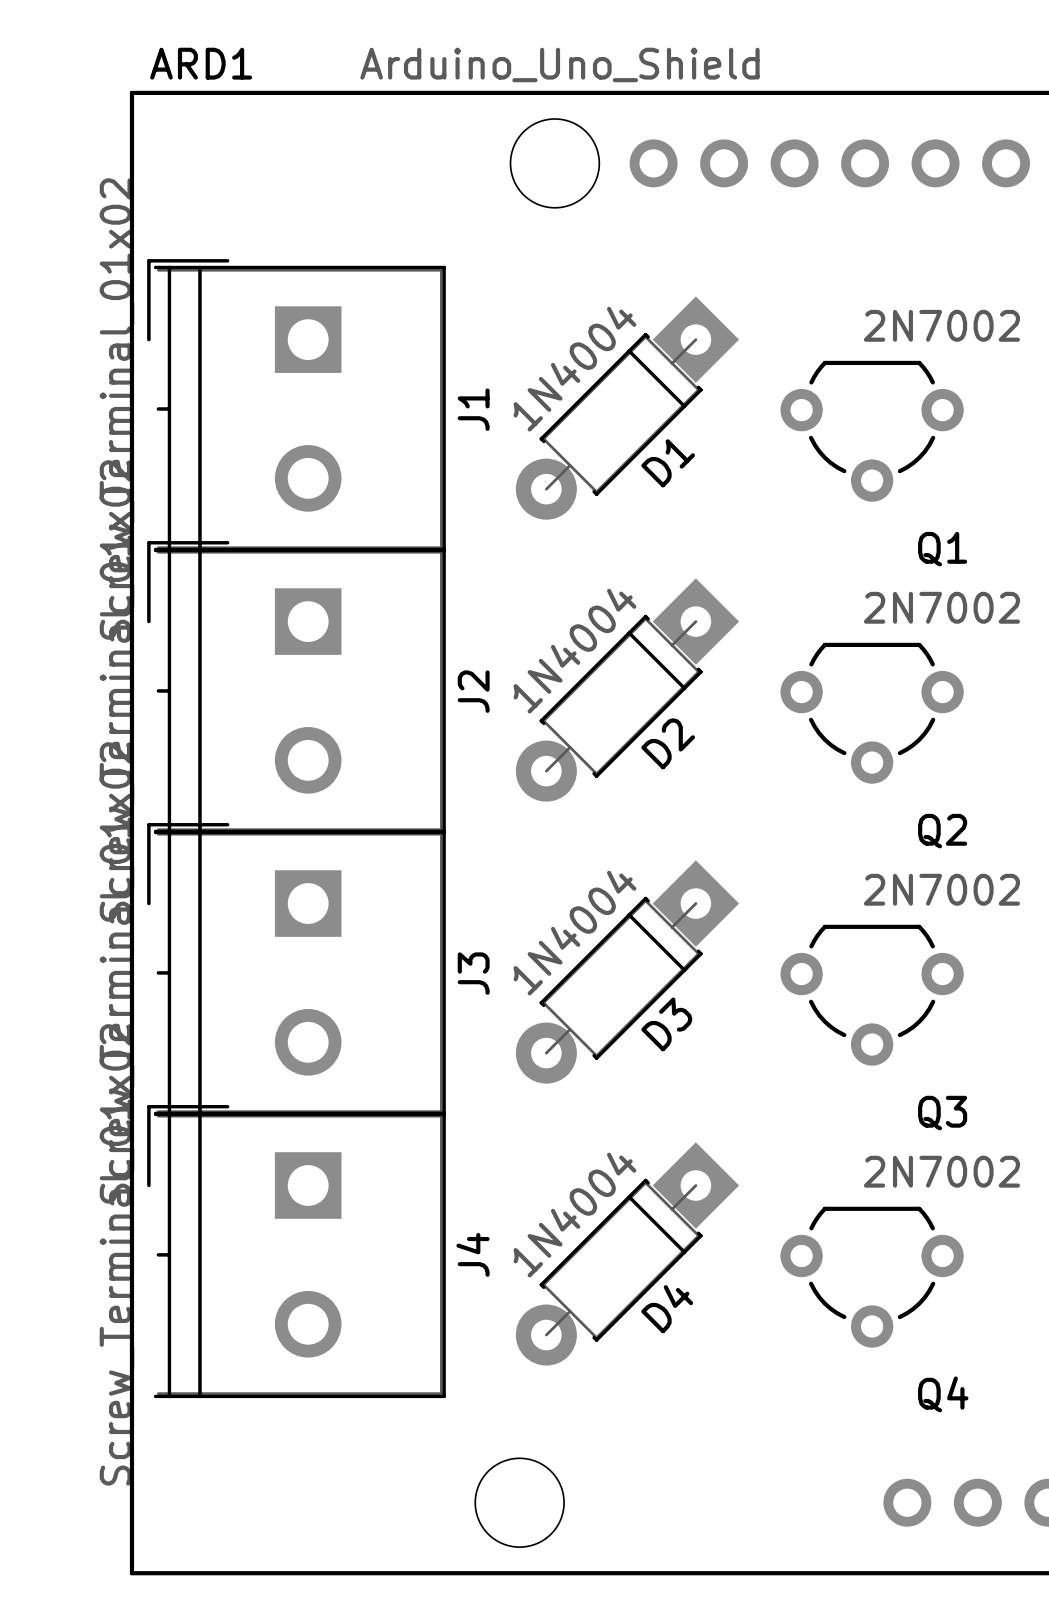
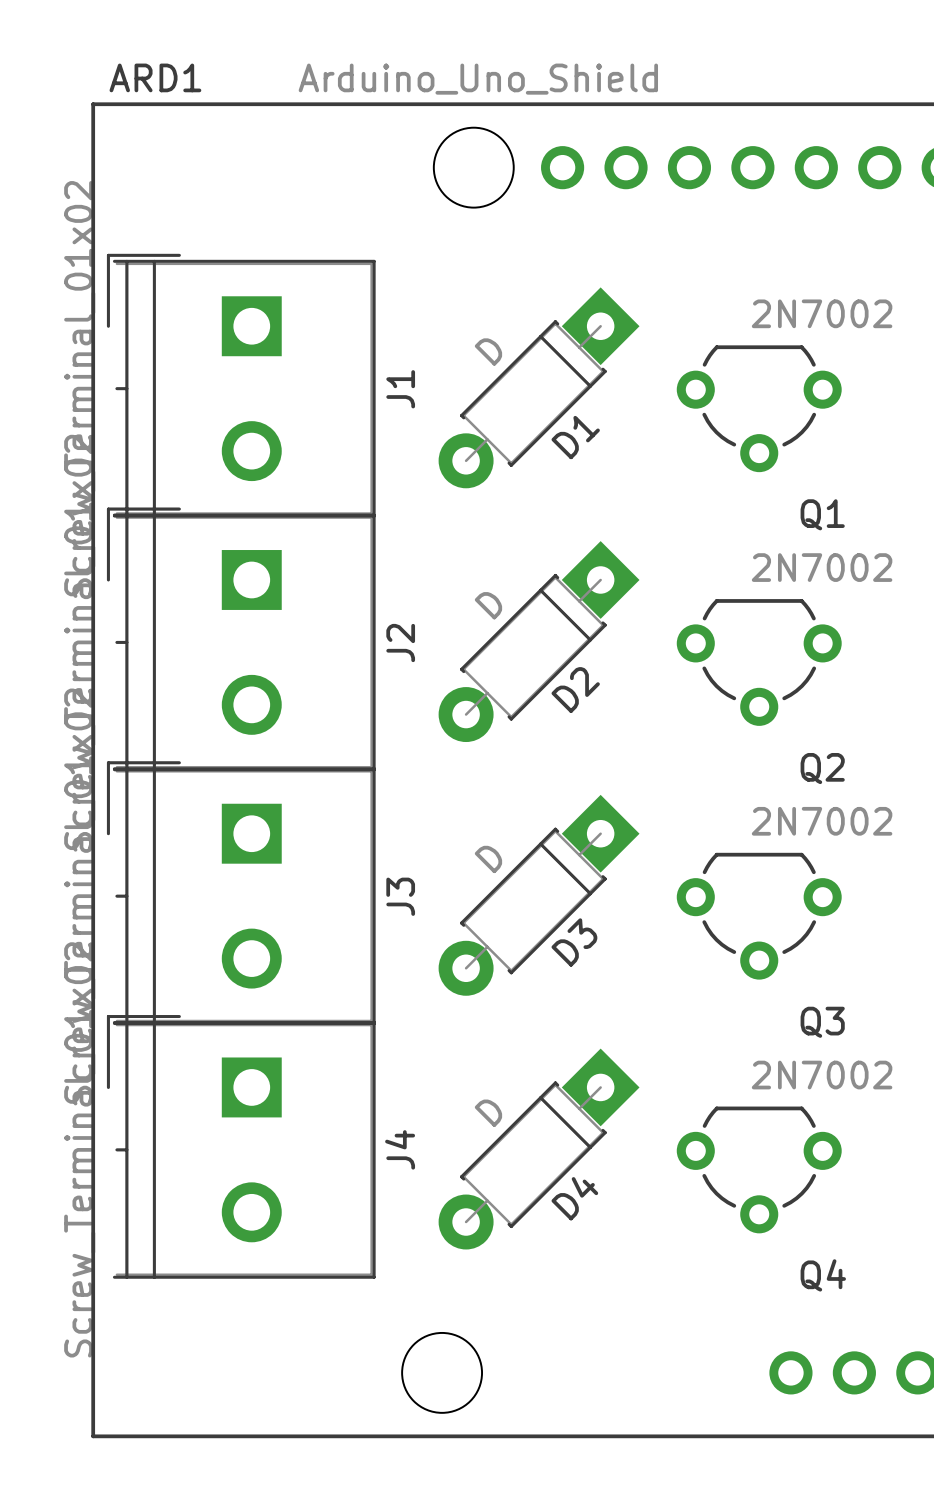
D1 value: 1N4004 (574, 369) -> D (488, 351)
D2 value: 1N4004 (574, 651) -> D (488, 605)
D3 value: 1N4004 (574, 933) -> D (488, 859)
D4 value: 1N4004 (574, 1215) -> D (488, 1113)

